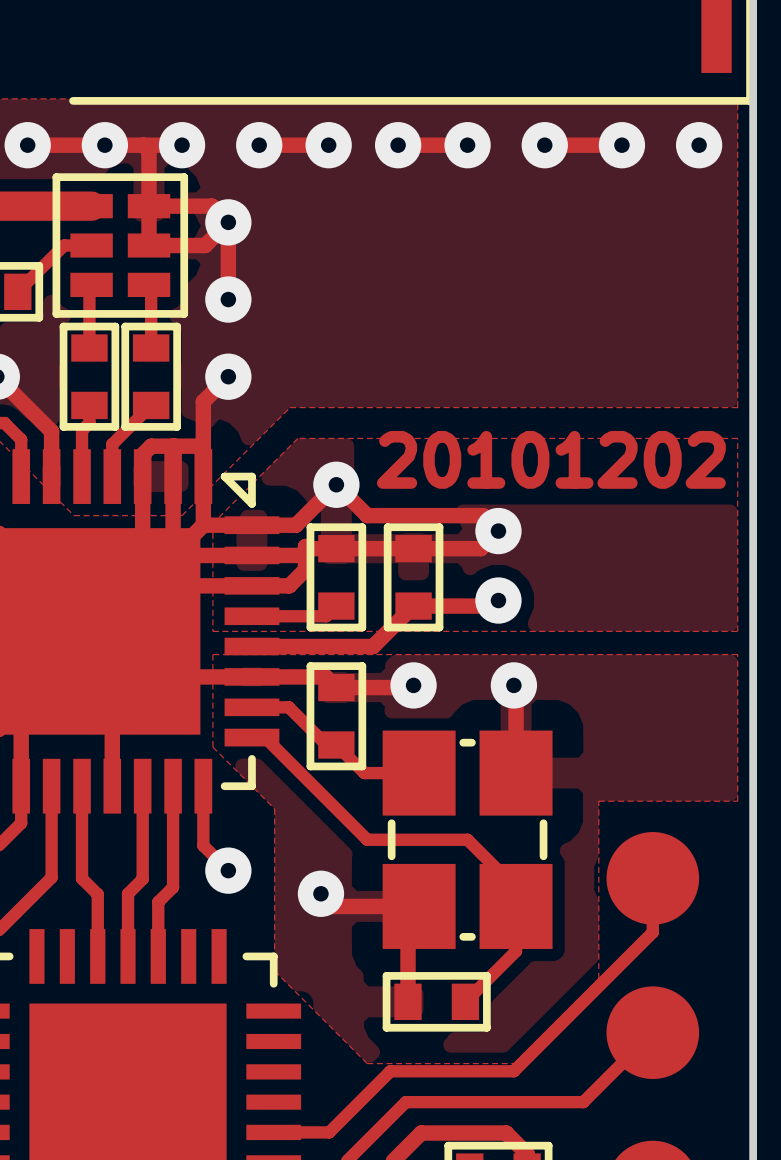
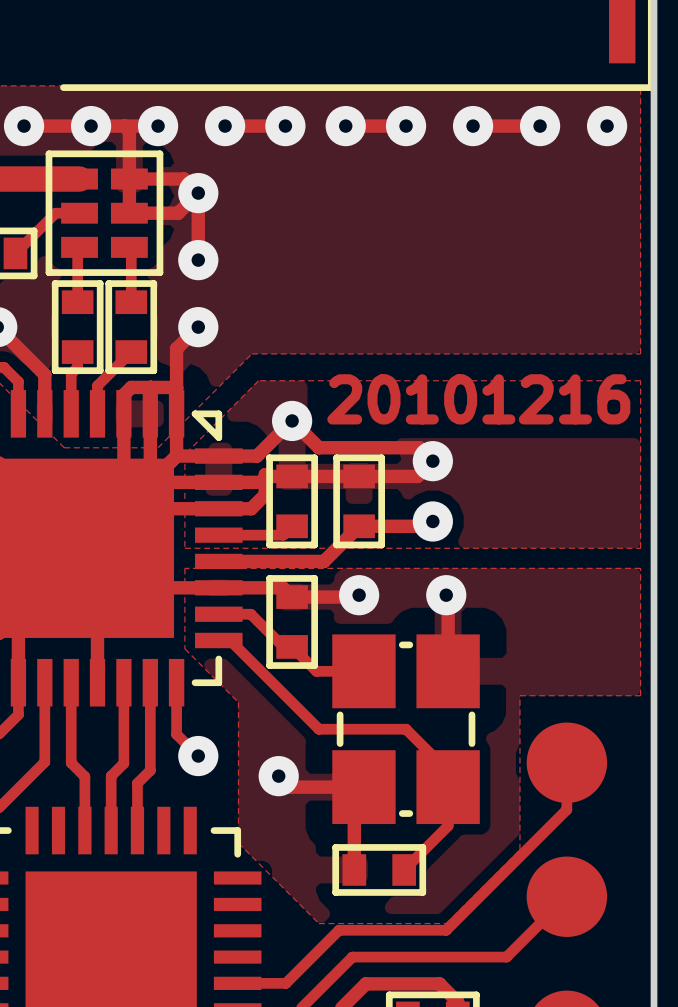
text: 20101202 (551, 459) -> 20101216 (478, 399)

